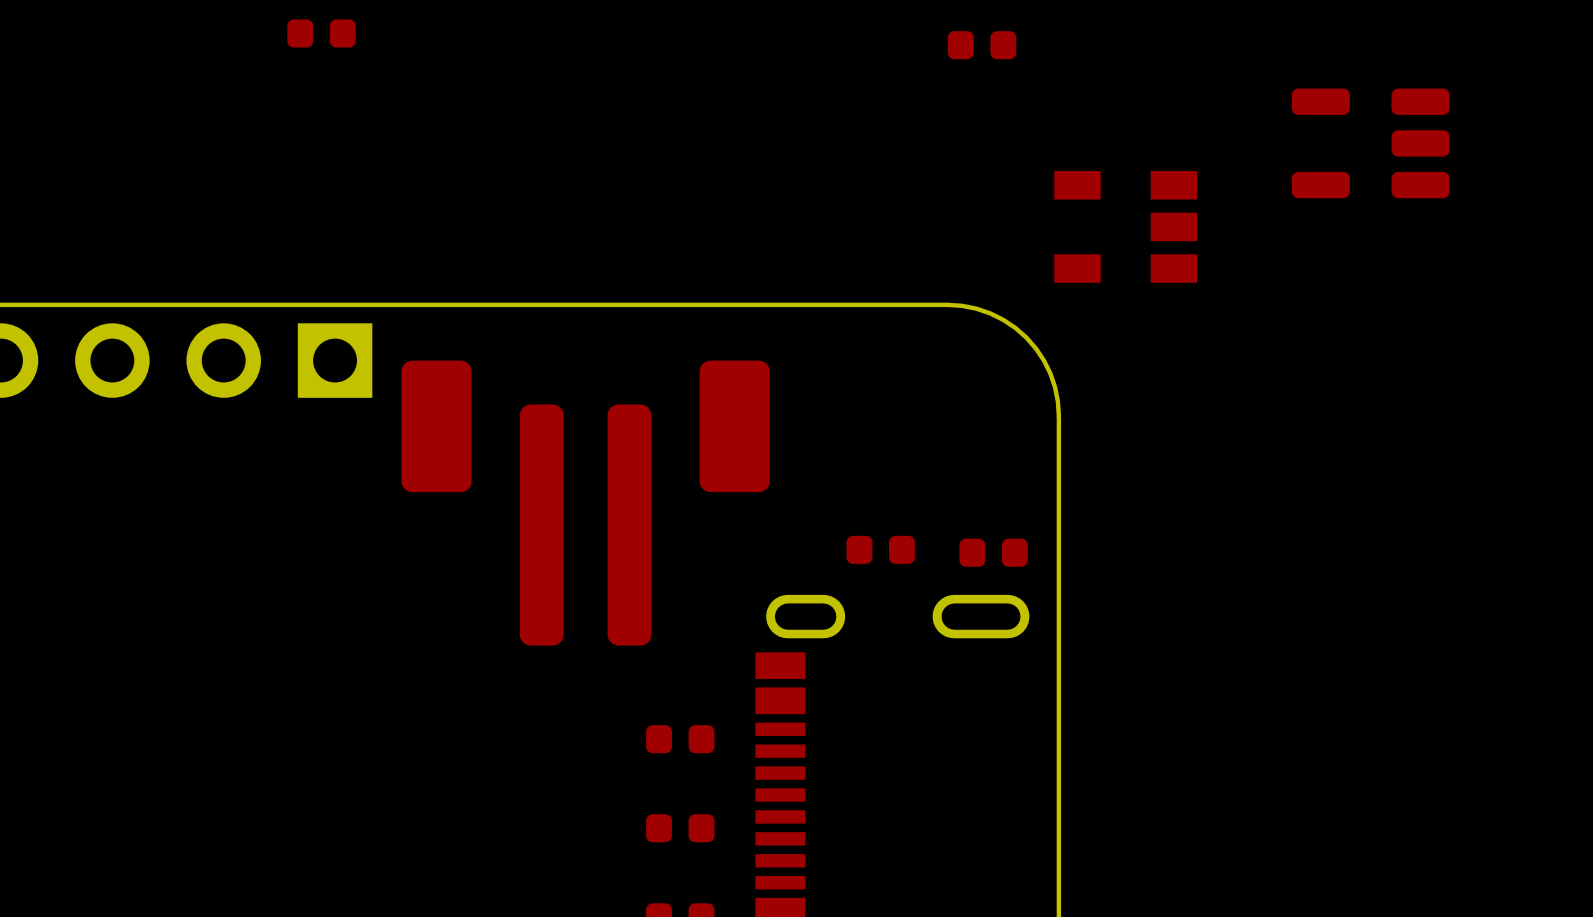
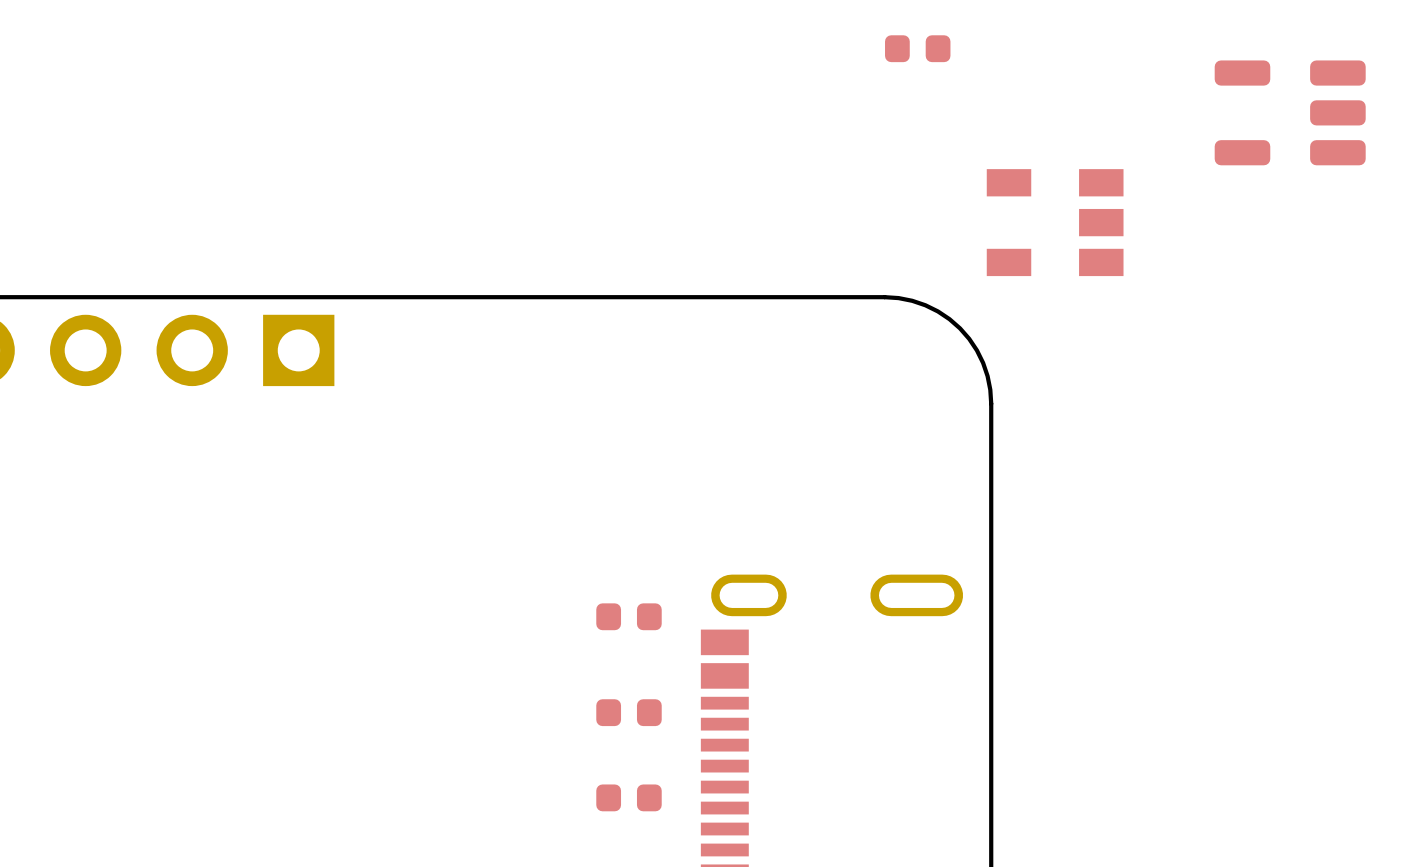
part: (321, 33) -> none
part position: (1370, 143) -> (1290, 112)
part: (585, 503) -> none
part: (880, 549) -> none
part: (993, 552) -> none
part: none -> (629, 616)

